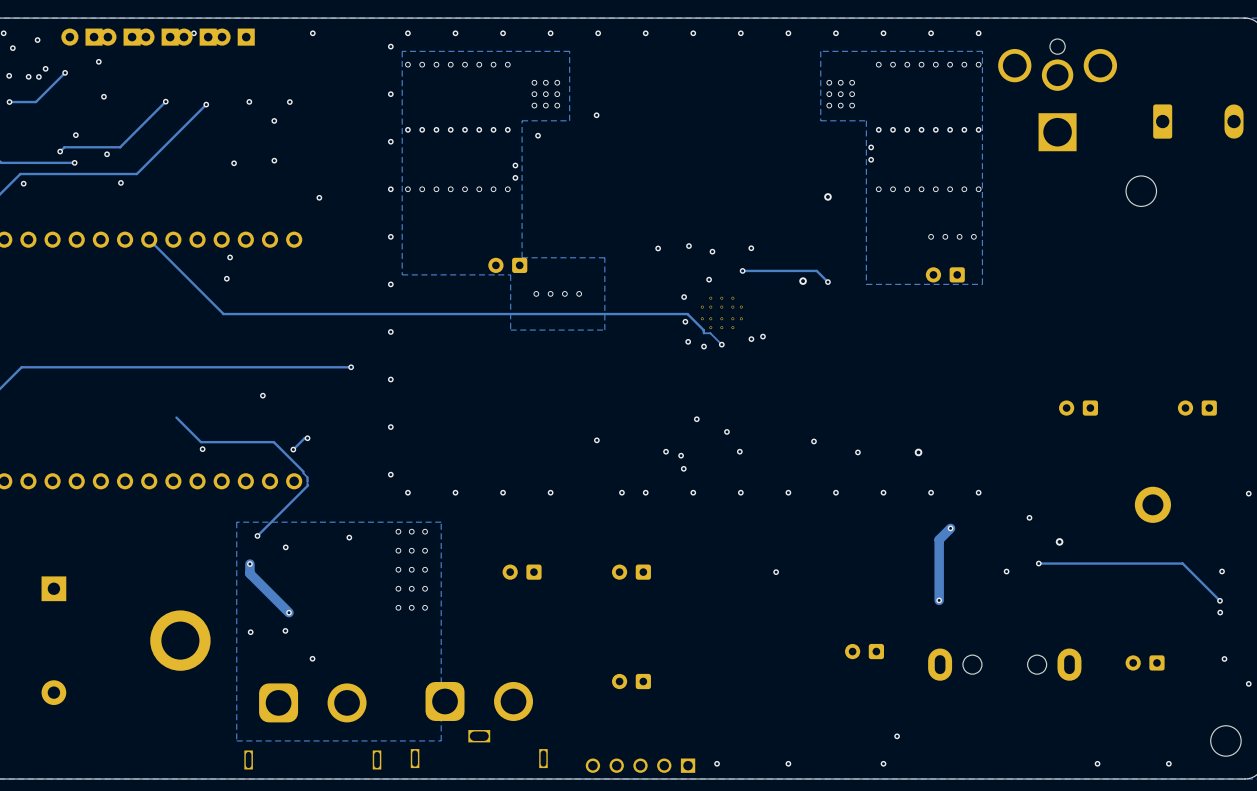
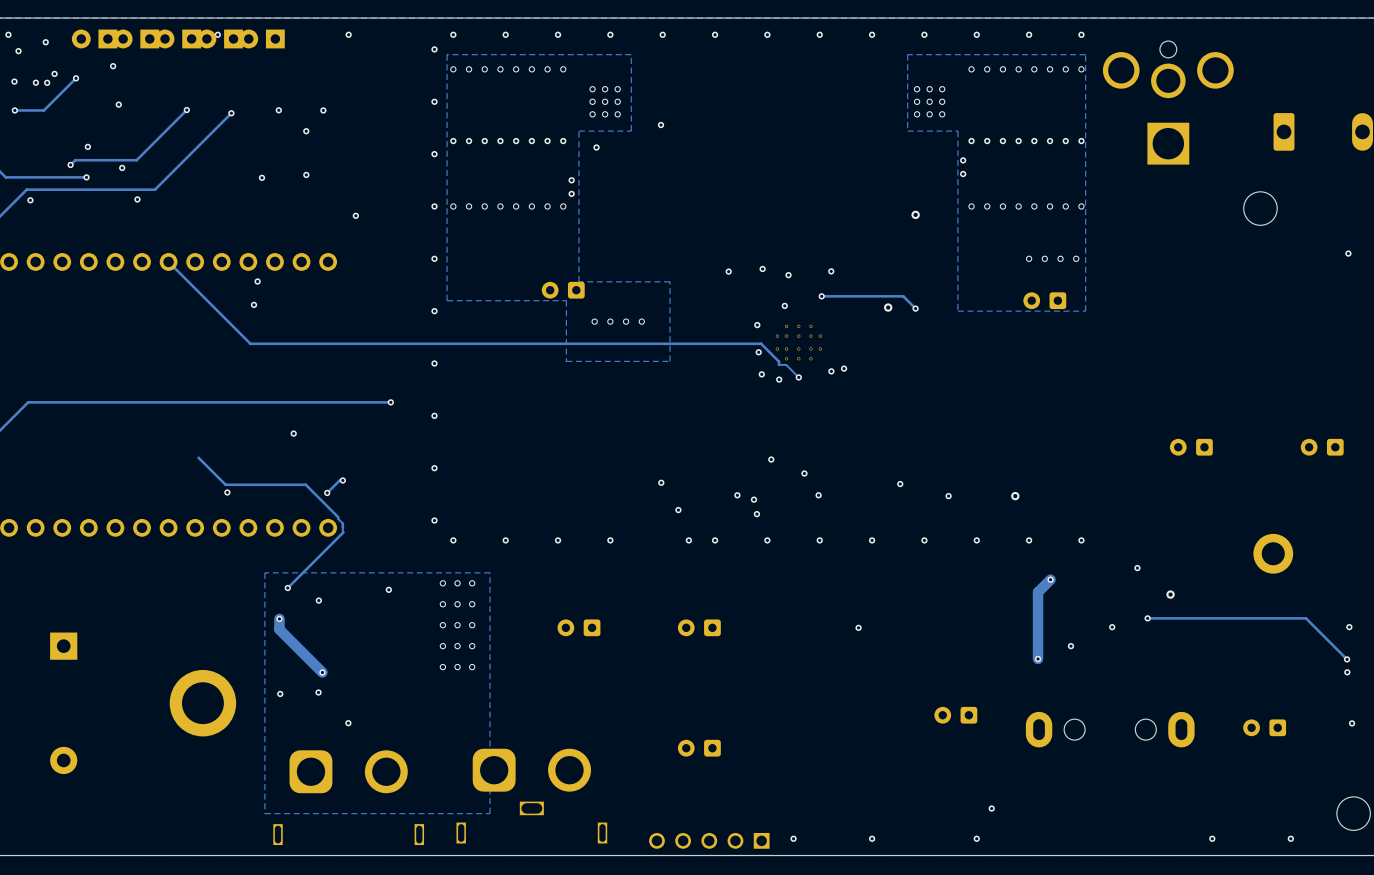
via: none -> (1348, 253)
via: none -> (678, 510)
via: none -> (1070, 646)

